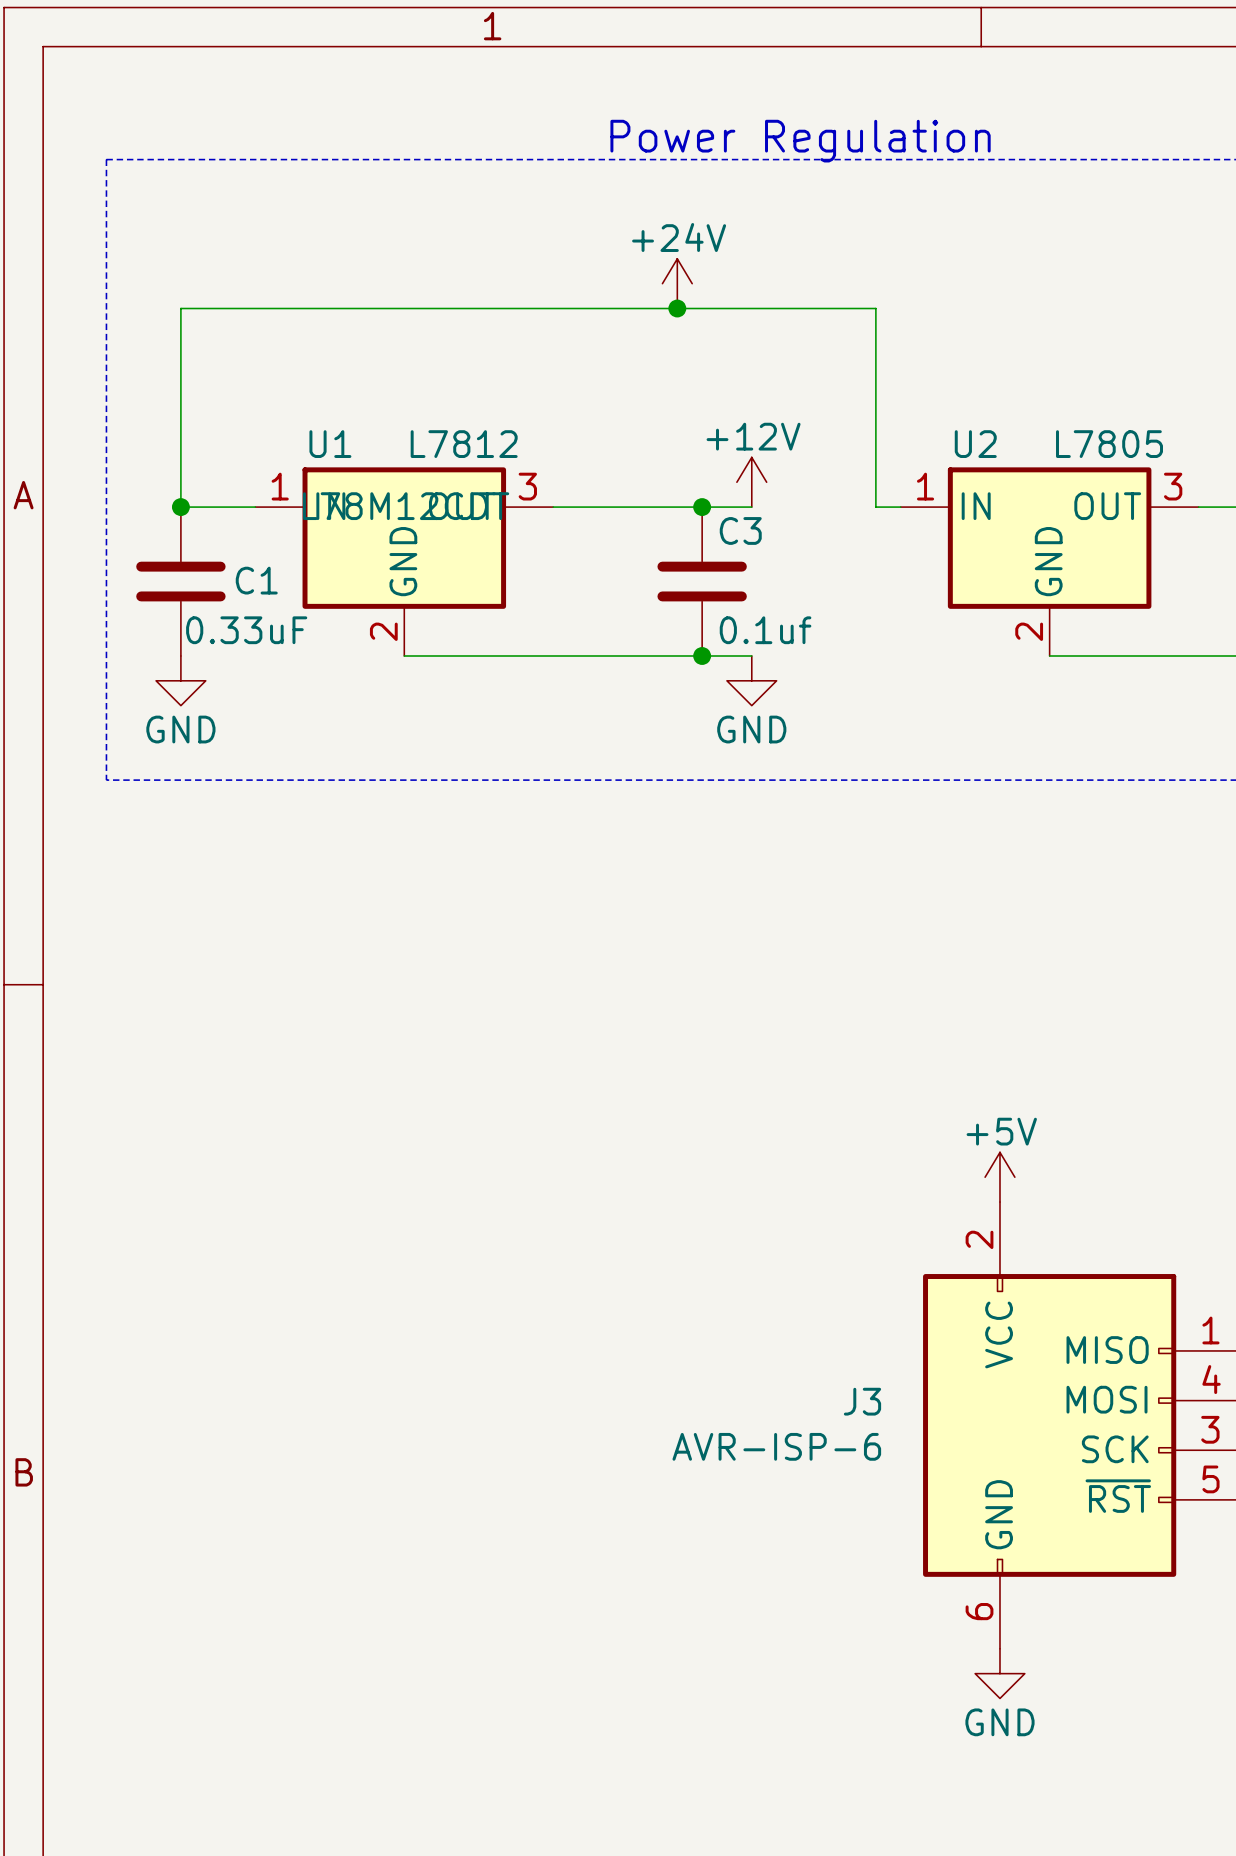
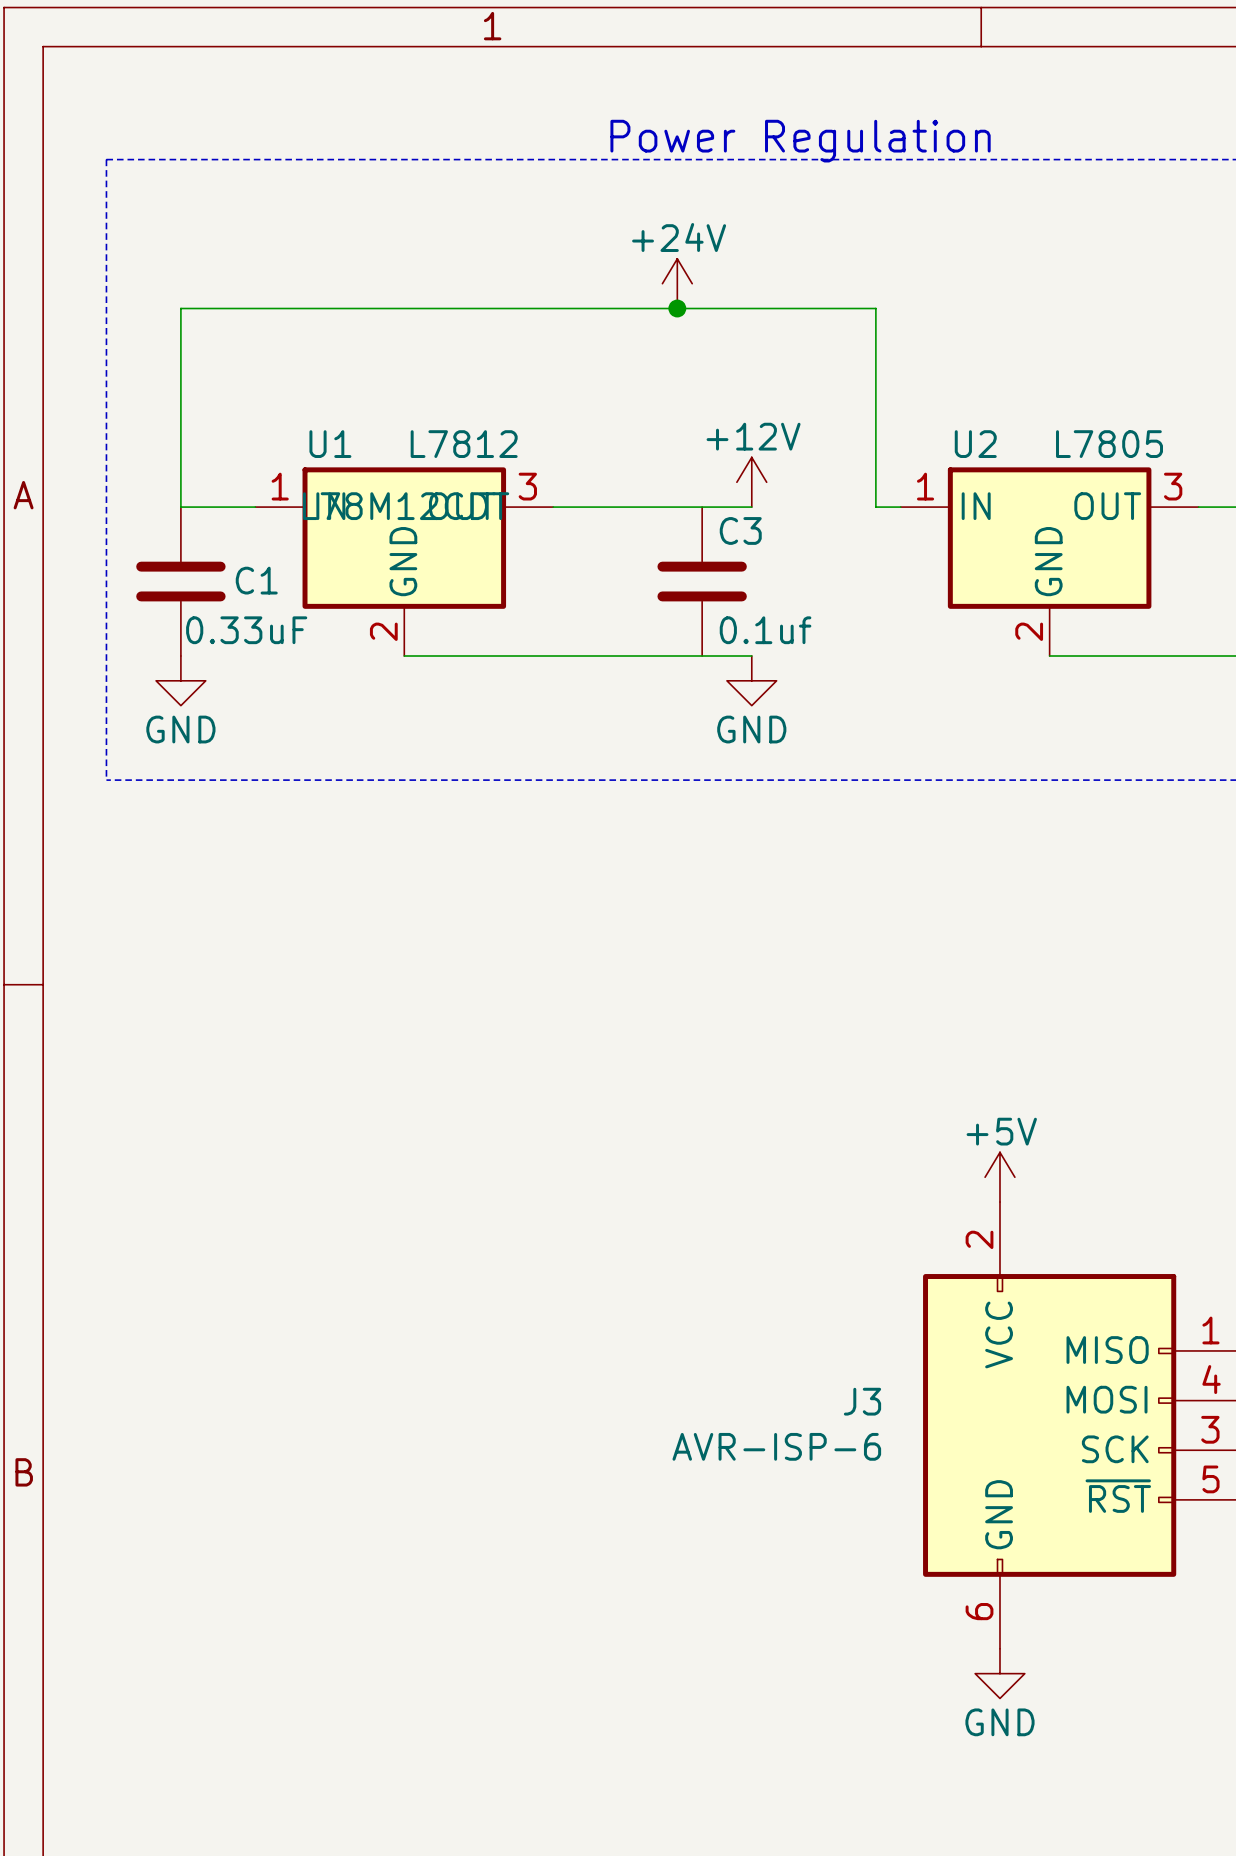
junction: (180, 507) -> none
junction: (702, 507) -> none
junction: (702, 656) -> none

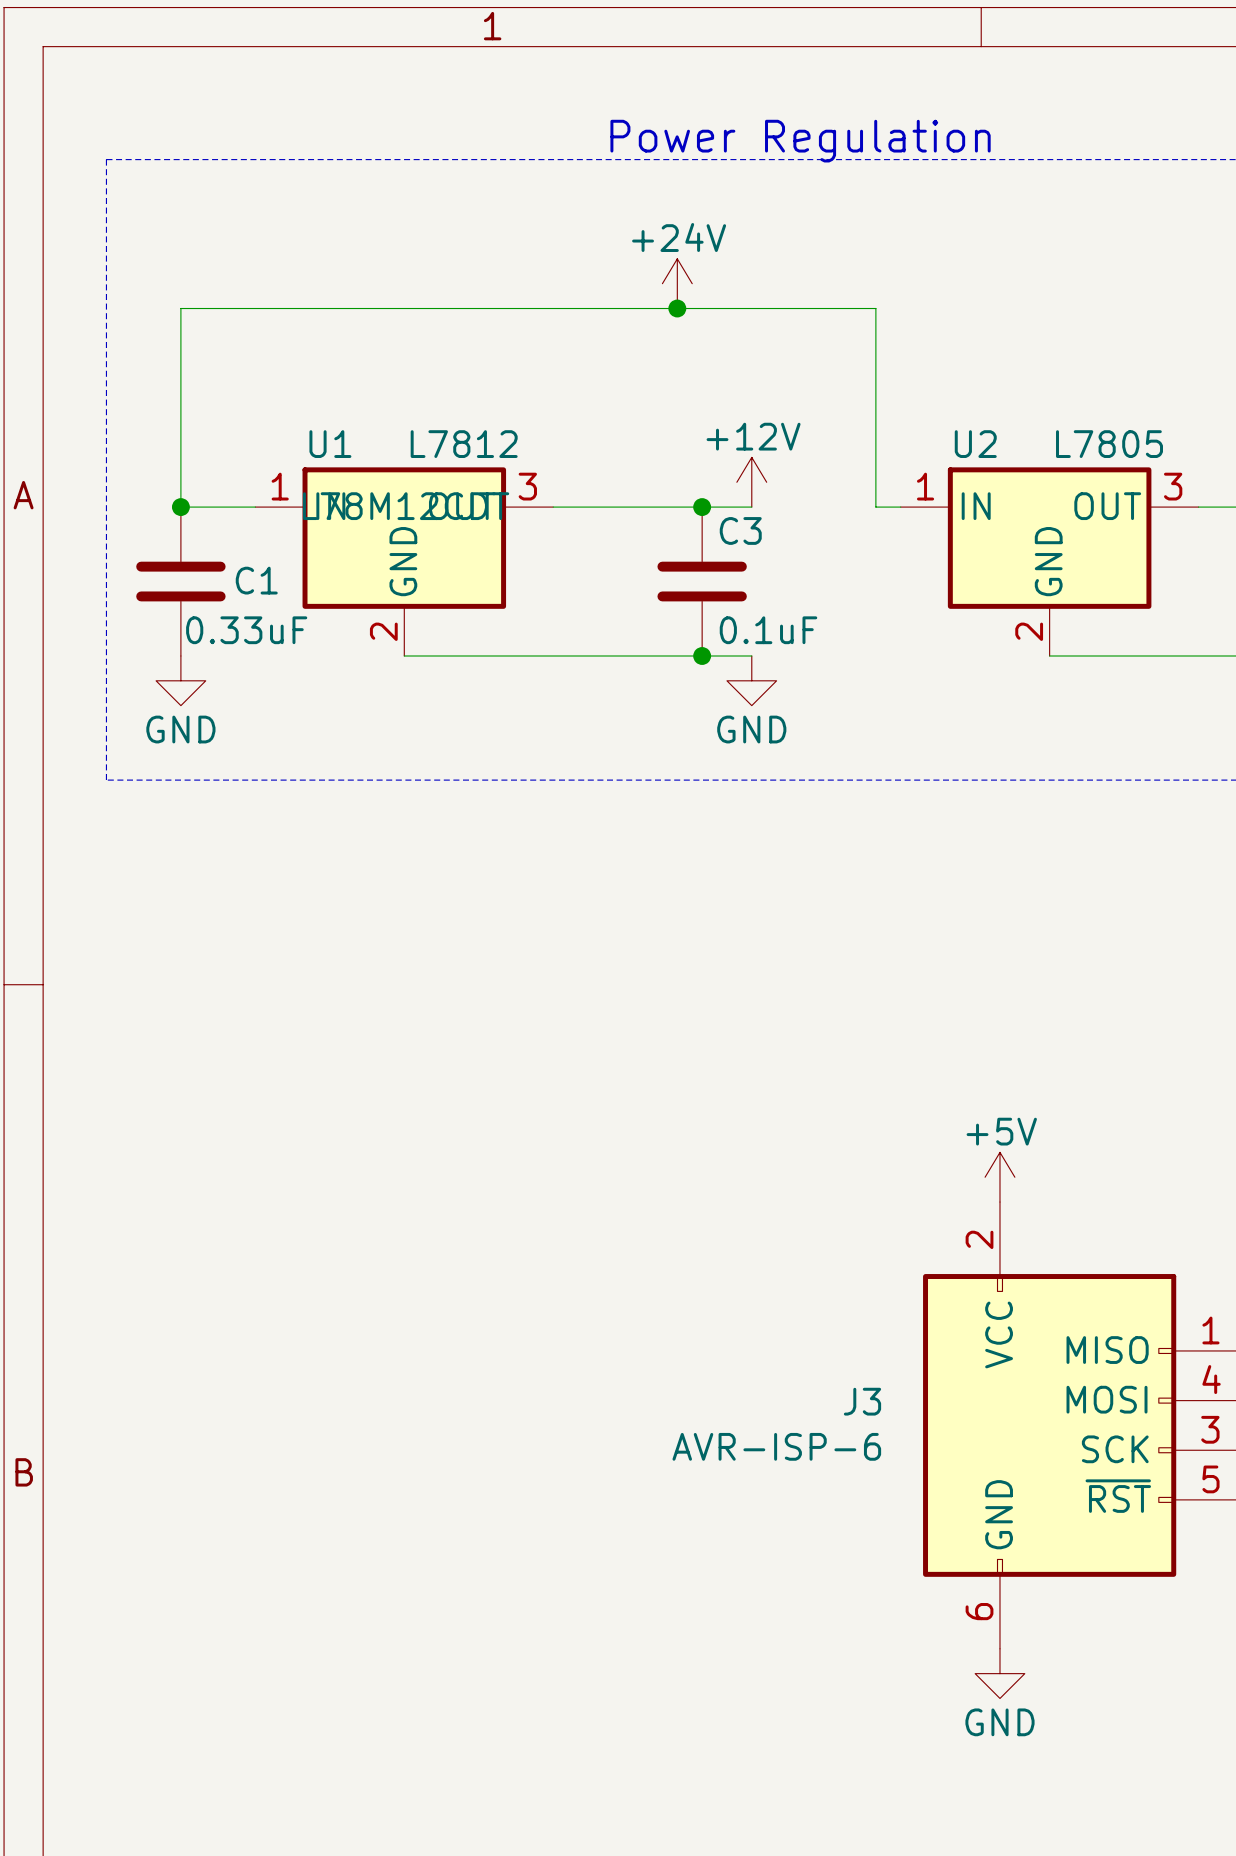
junction: none -> (180, 507)
junction: none -> (702, 507)
C3 value: 0.1uf (765, 630) -> 0.1uF (768, 630)
junction: none -> (702, 656)

